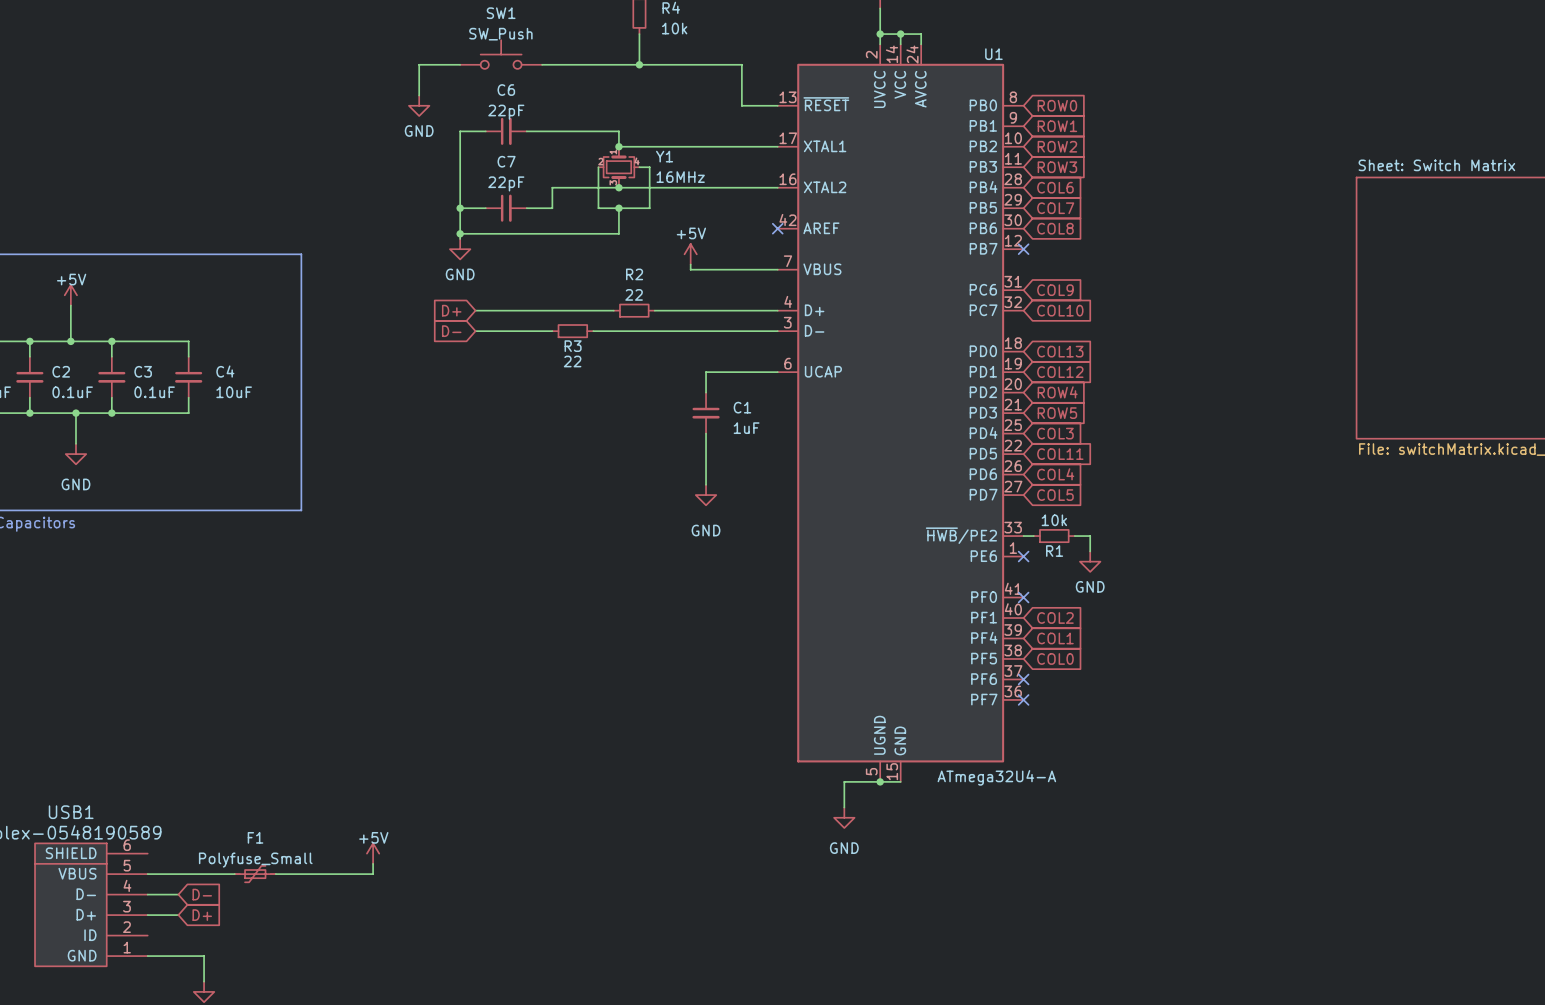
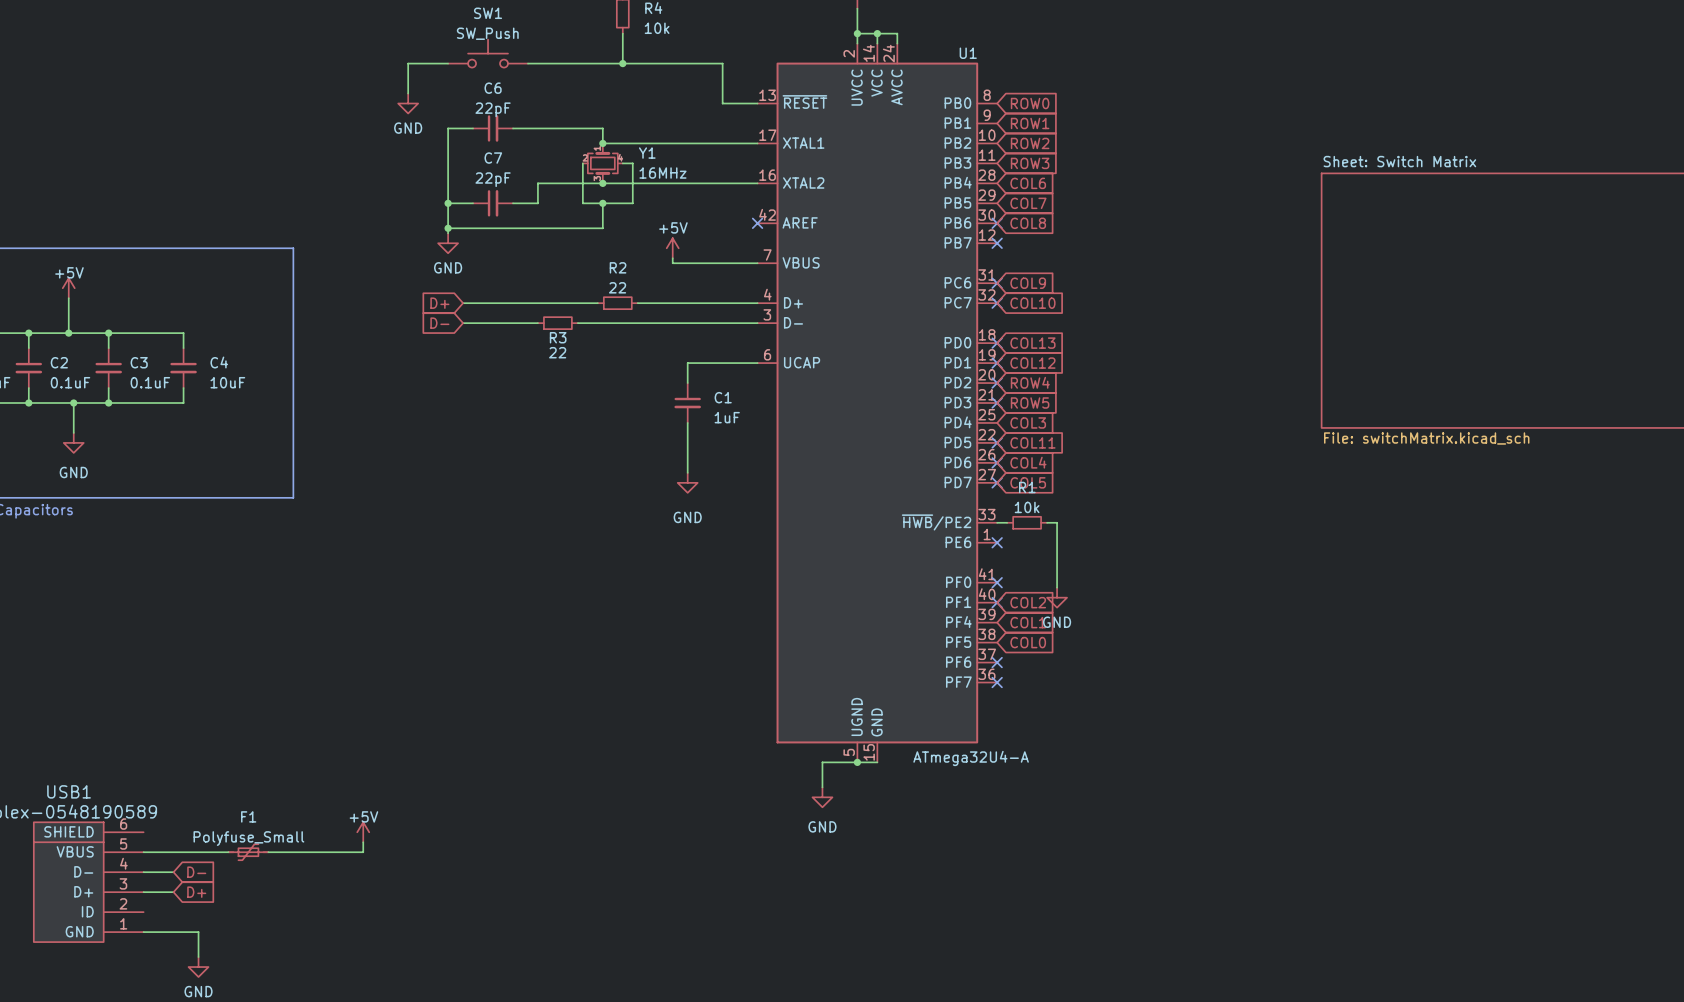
no-connect mark: none -> (997, 223)
no-connect mark: none -> (997, 283)
no-connect mark: none -> (997, 303)
no-connect mark: none -> (997, 343)
no-connect mark: none -> (997, 363)
no-connect mark: none -> (997, 383)
no-connect mark: none -> (997, 403)
no-connect mark: none -> (997, 442)
no-connect mark: none -> (997, 462)
no-connect mark: none -> (997, 482)
wire: (1085, 536) (1090, 536) (1090, 551) -> (1057, 522) (1057, 587)
R1 name position: R1 (1054, 551) -> R1 (1027, 487)
power symbol position: GND (1090, 561) -> GND (1057, 597)
no-connect mark: none -> (997, 602)

